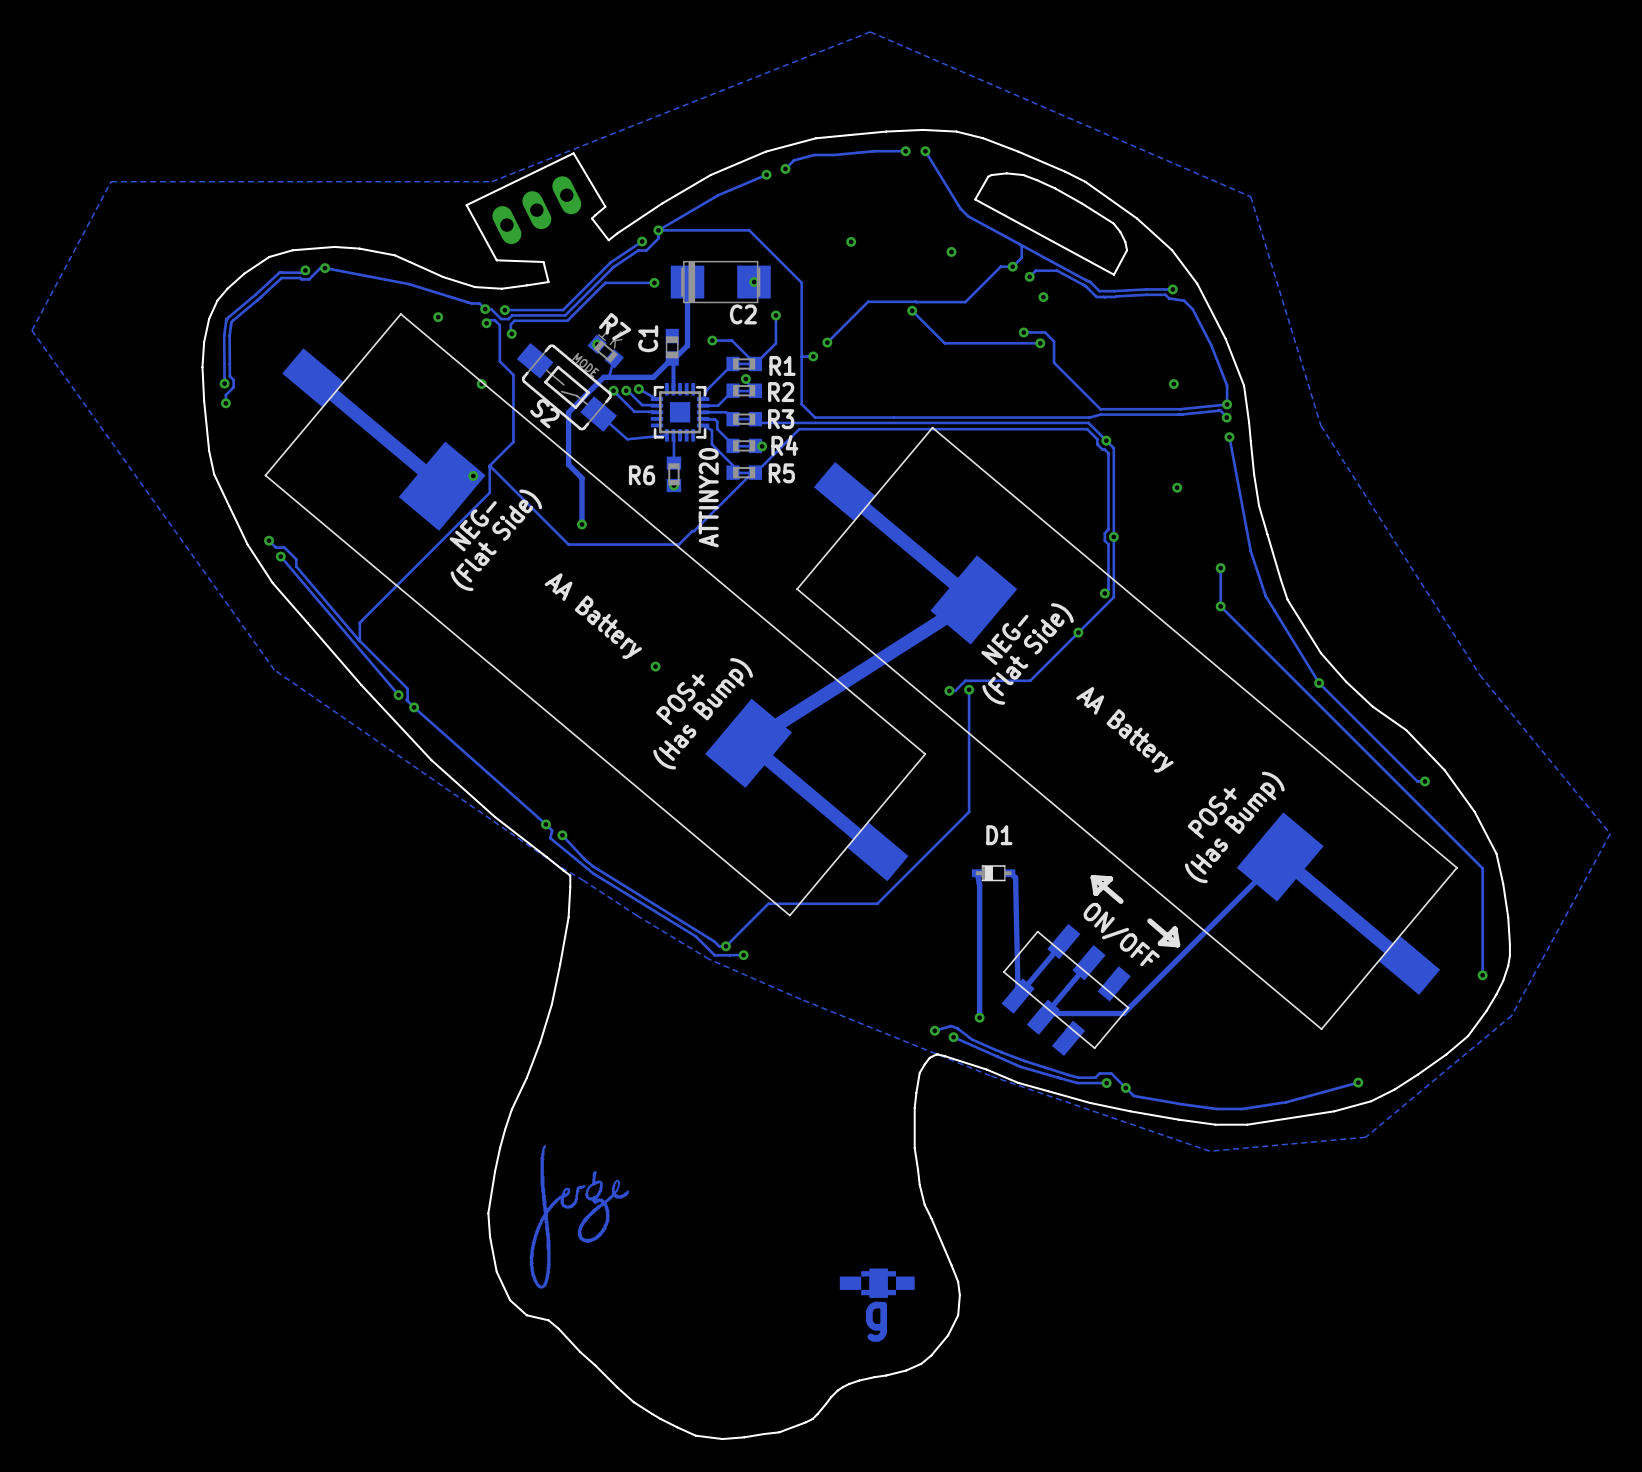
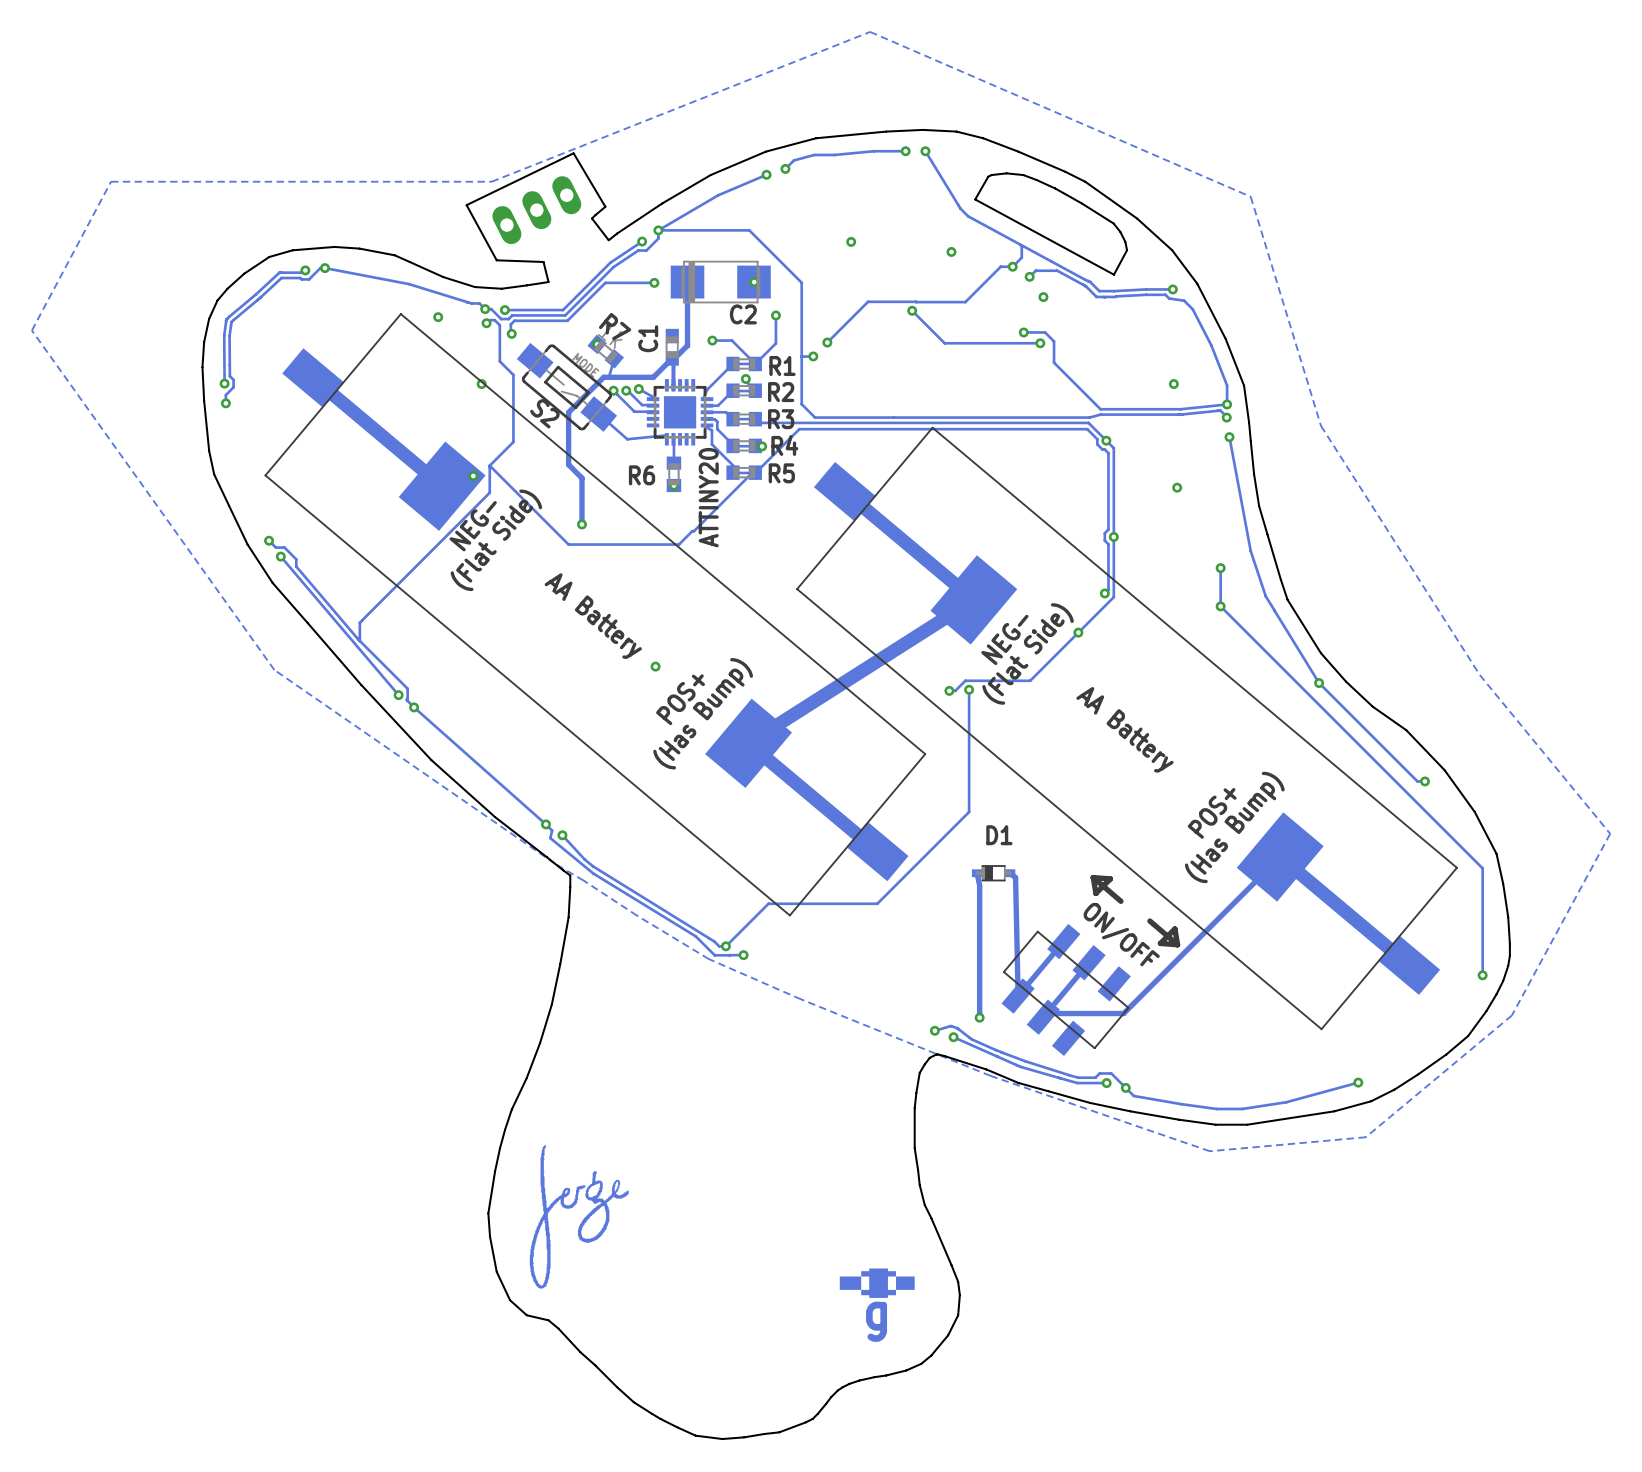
part footprint: [650, 383, 710, 442] -> [646, 379, 714, 446]

